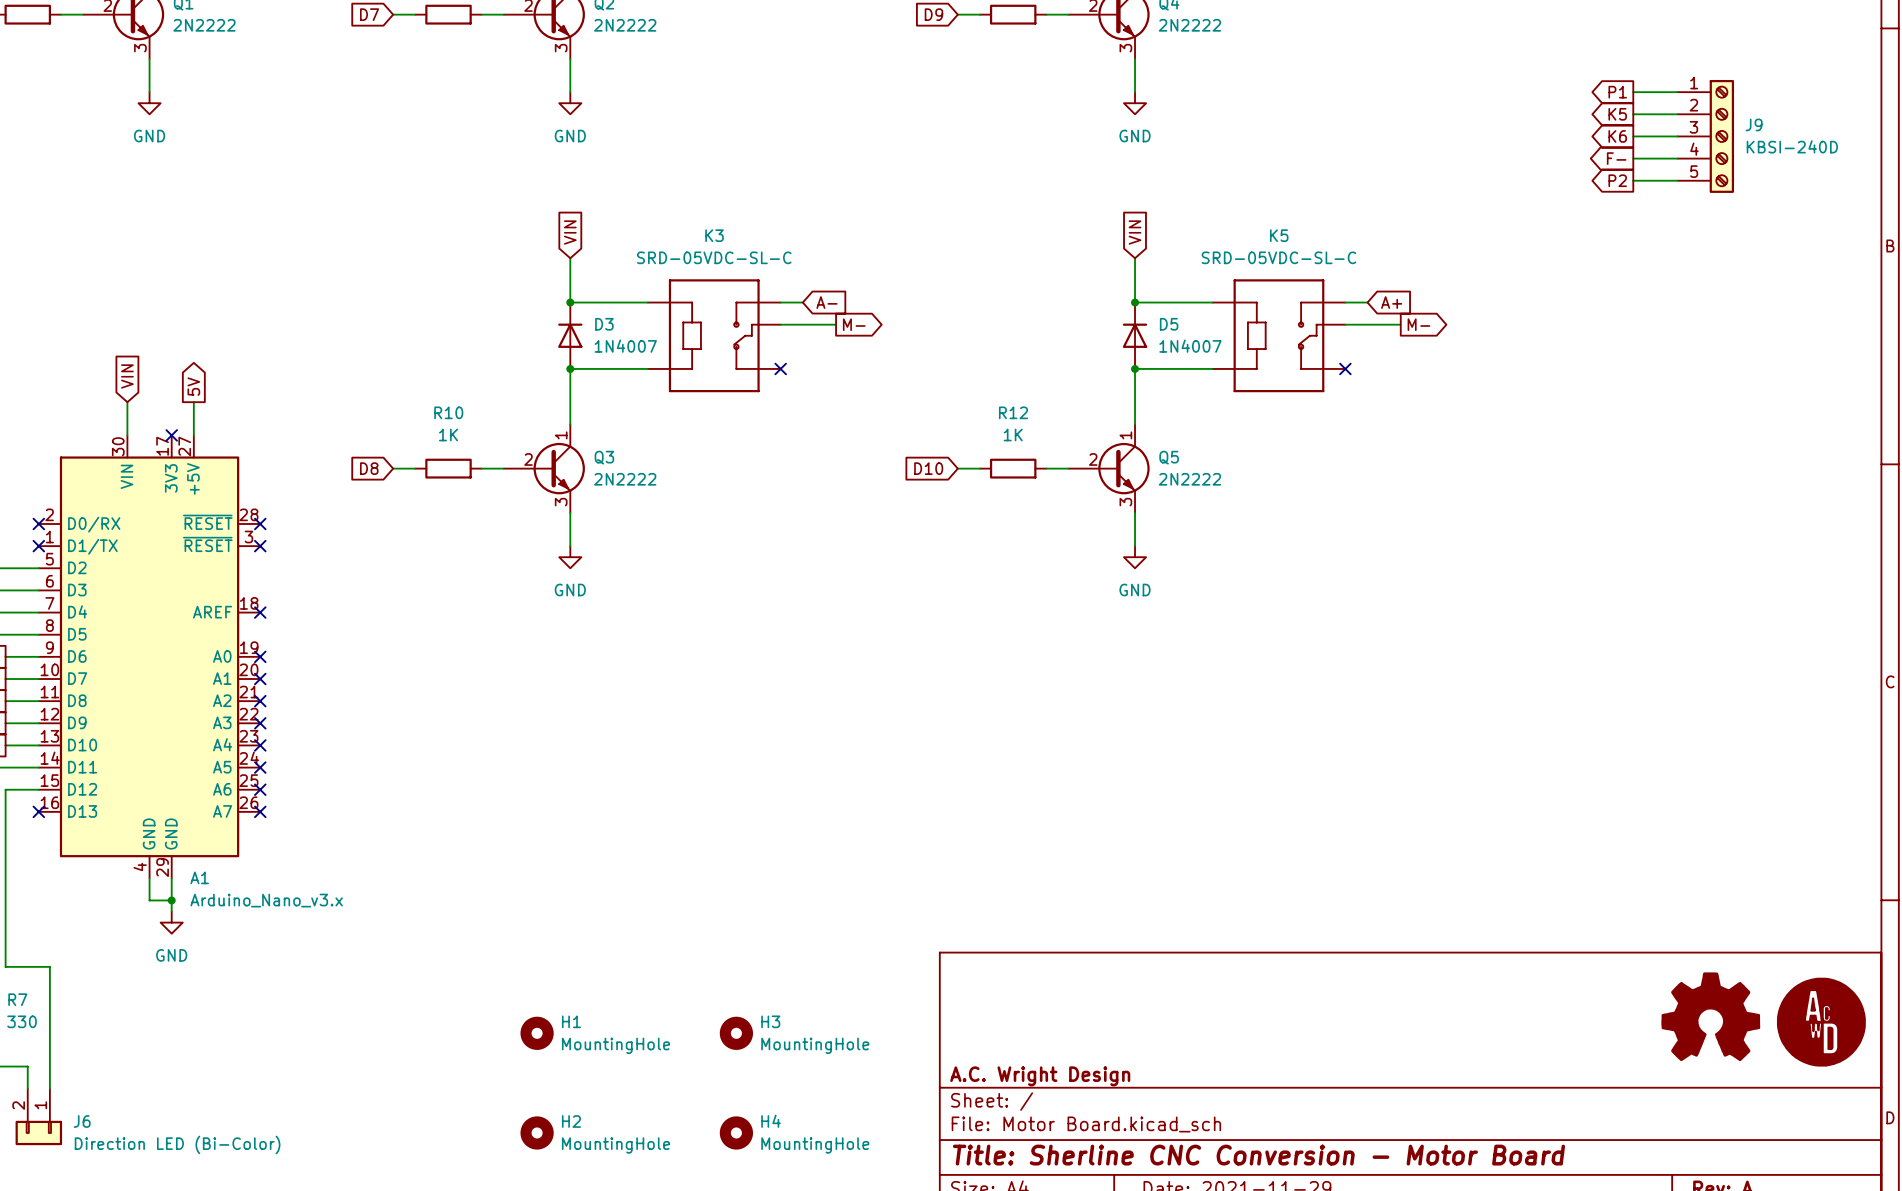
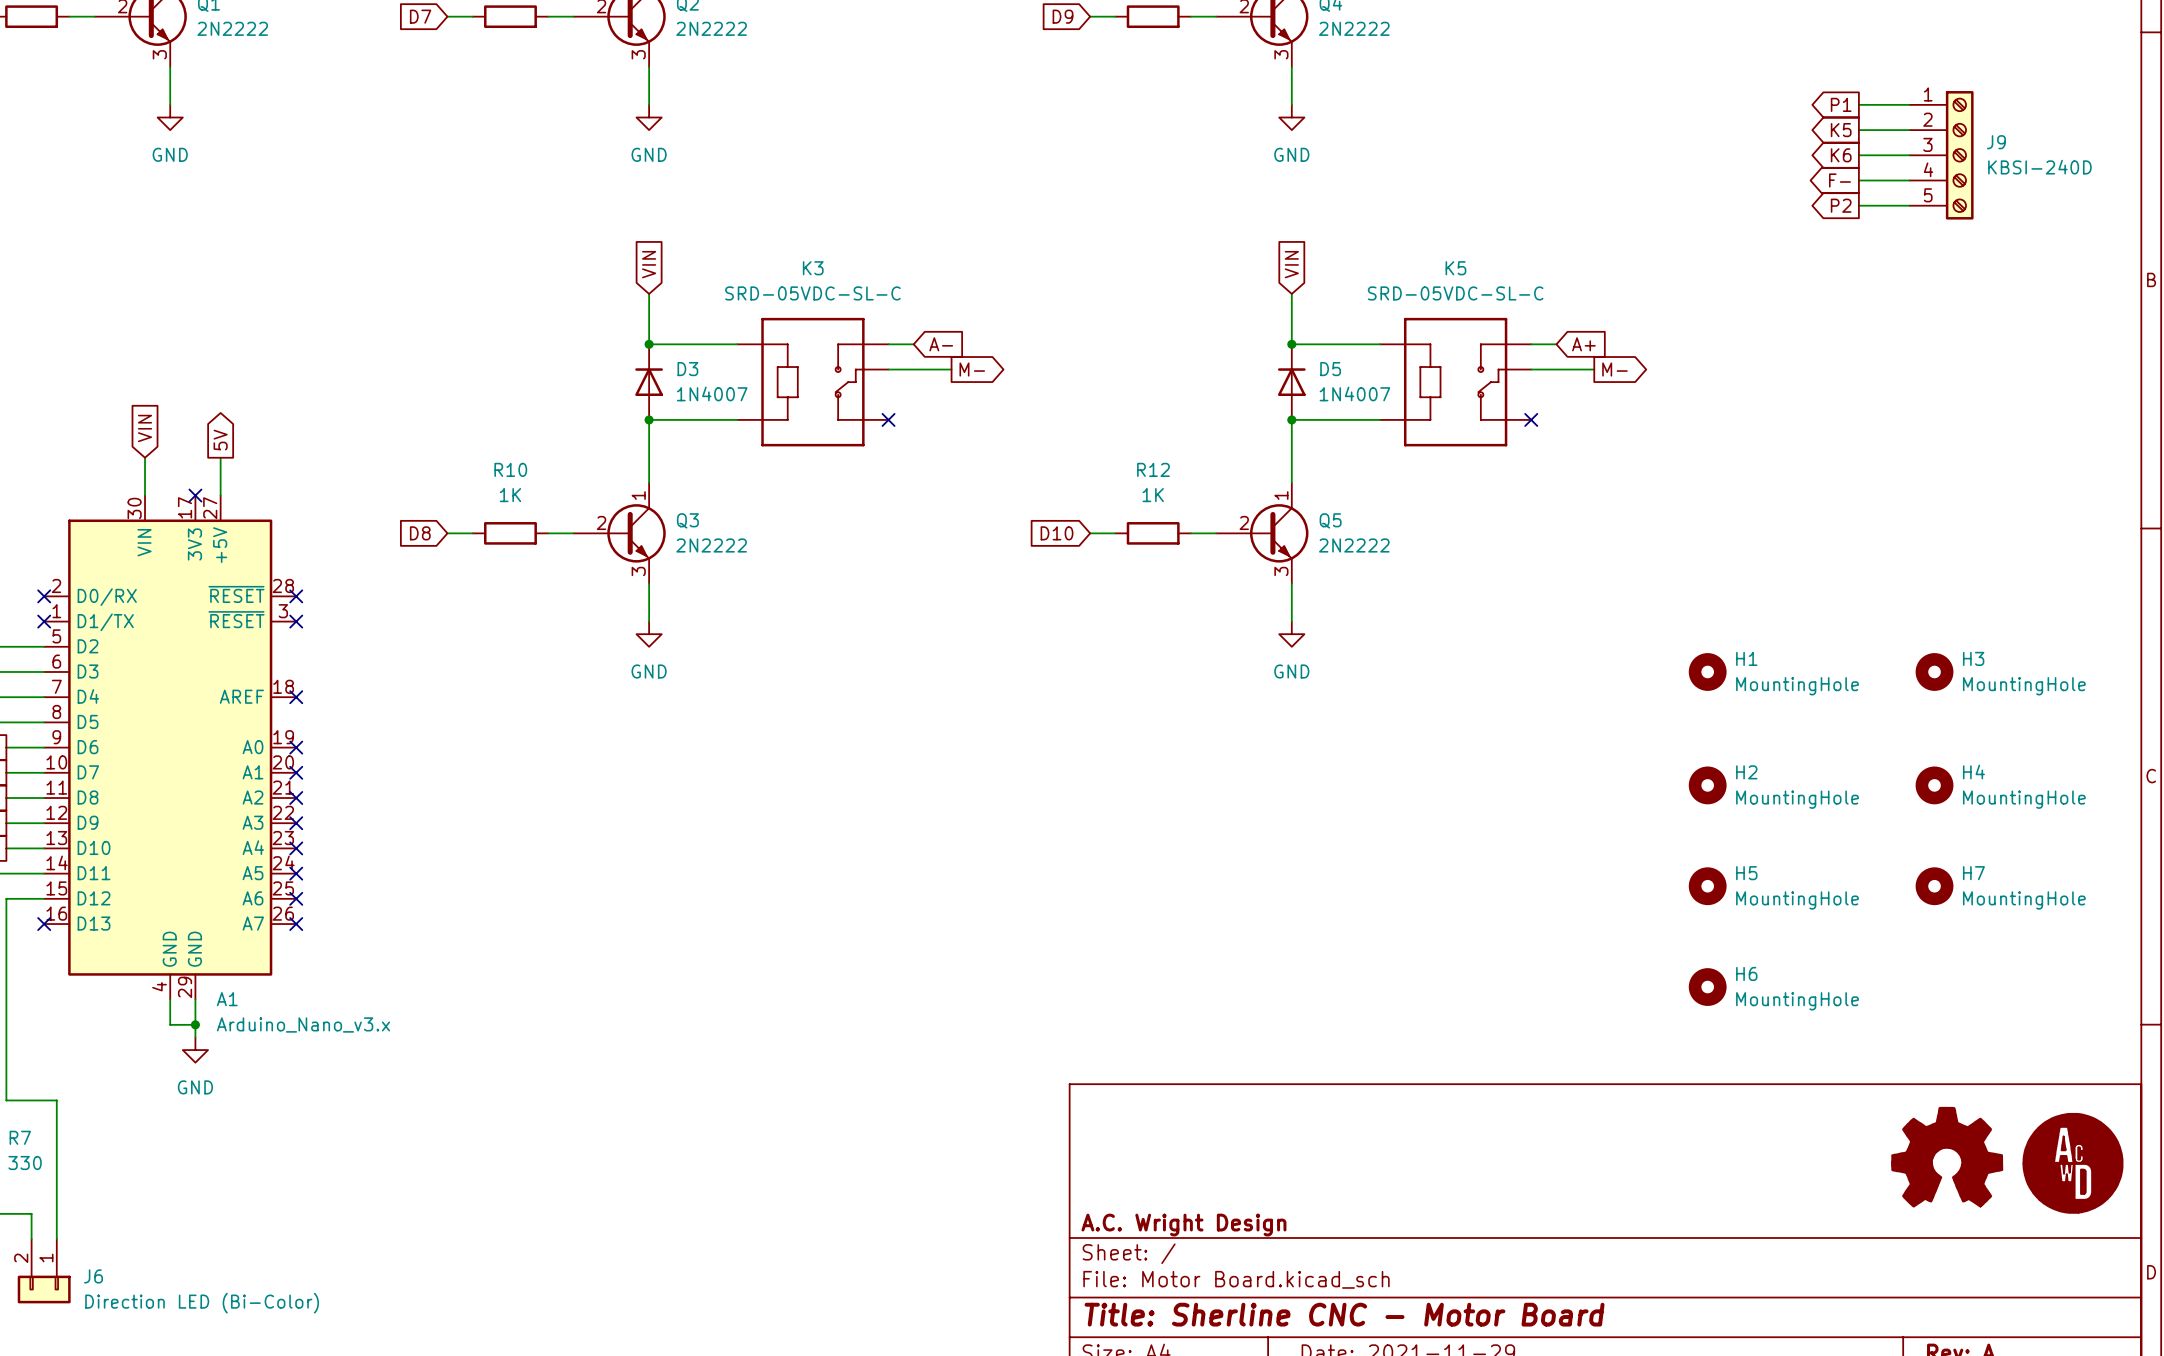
H5: none -> MountingHole (1707, 886)
H7: none -> MountingHole (1934, 886)
H6: none -> MountingHole (1707, 987)
H1 position: (537, 1033) -> (1707, 671)
H3 position: (736, 1033) -> (1934, 671)
H2 position: (537, 1132) -> (1707, 785)
H4 position: (736, 1132) -> (1934, 785)
title block: Title: Sherline CNC Conversion - Motor Board (1258, 1155) -> Title: Sherline CNC - Motor Board (1344, 1314)

